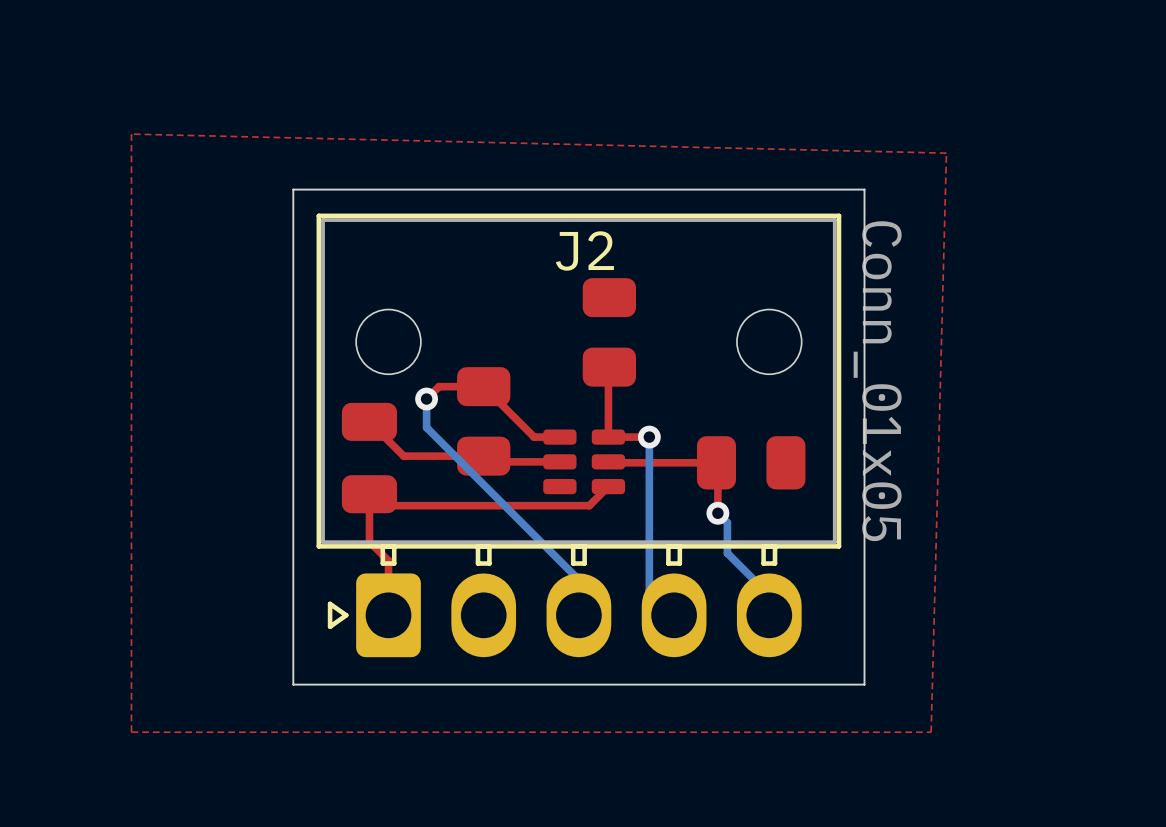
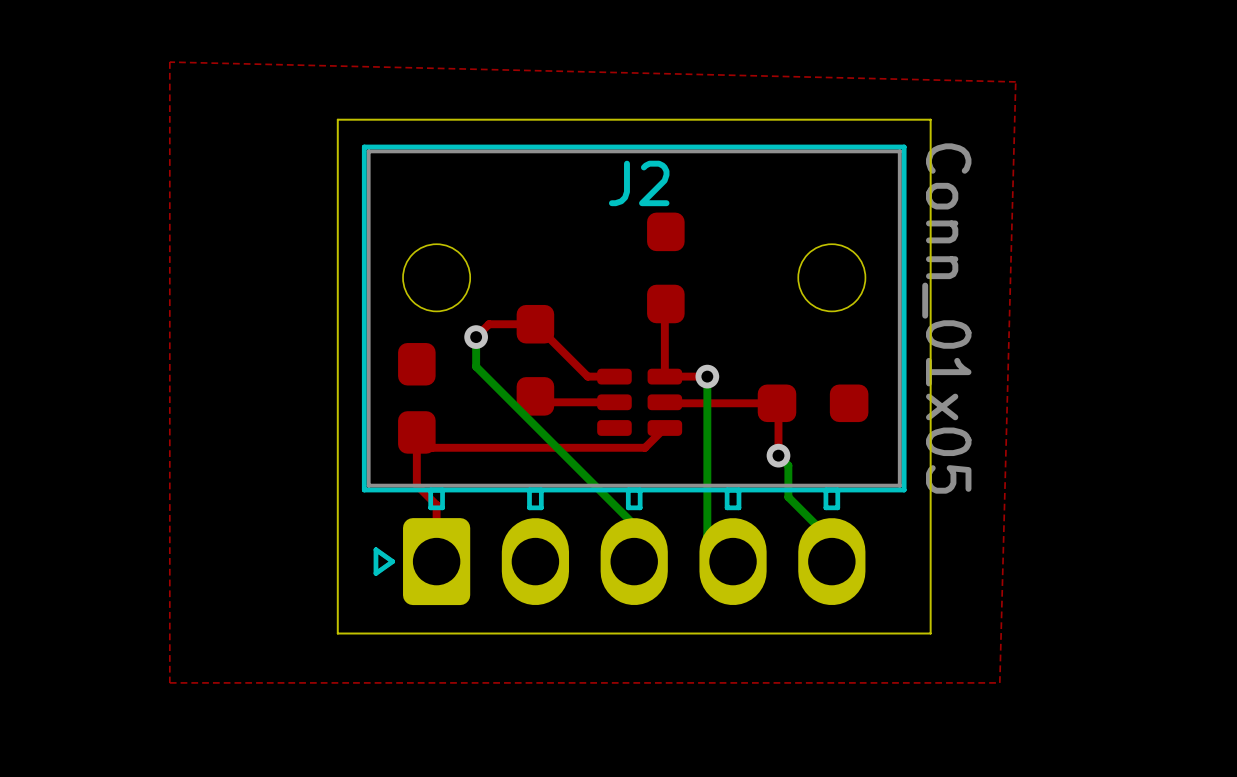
part footprint: [582, 278, 637, 387] -> [647, 212, 685, 324]
part footprint: [457, 367, 511, 476] -> [516, 304, 555, 416]
part footprint: [341, 402, 398, 514] -> [398, 343, 436, 454]
top track: (369, 421) (403, 456) (483, 456) -> none
part footprint: [696, 436, 806, 490] -> [757, 384, 869, 423]

